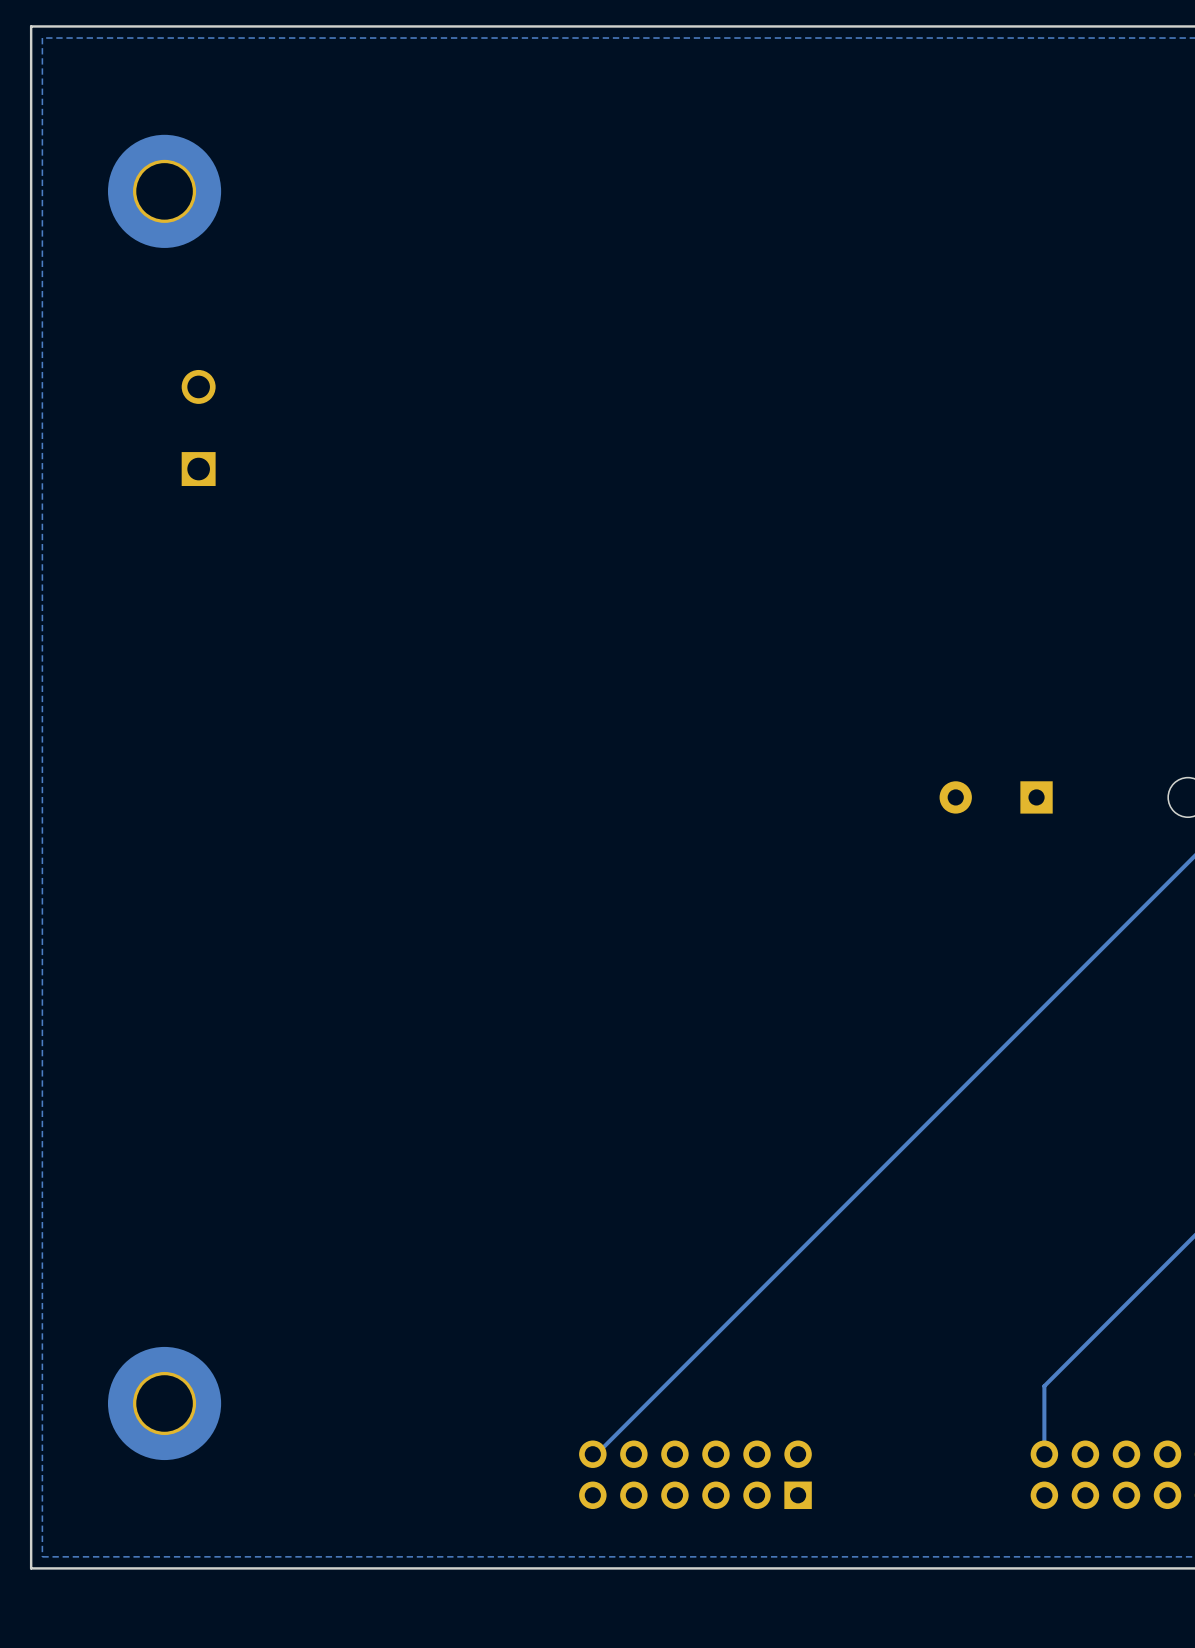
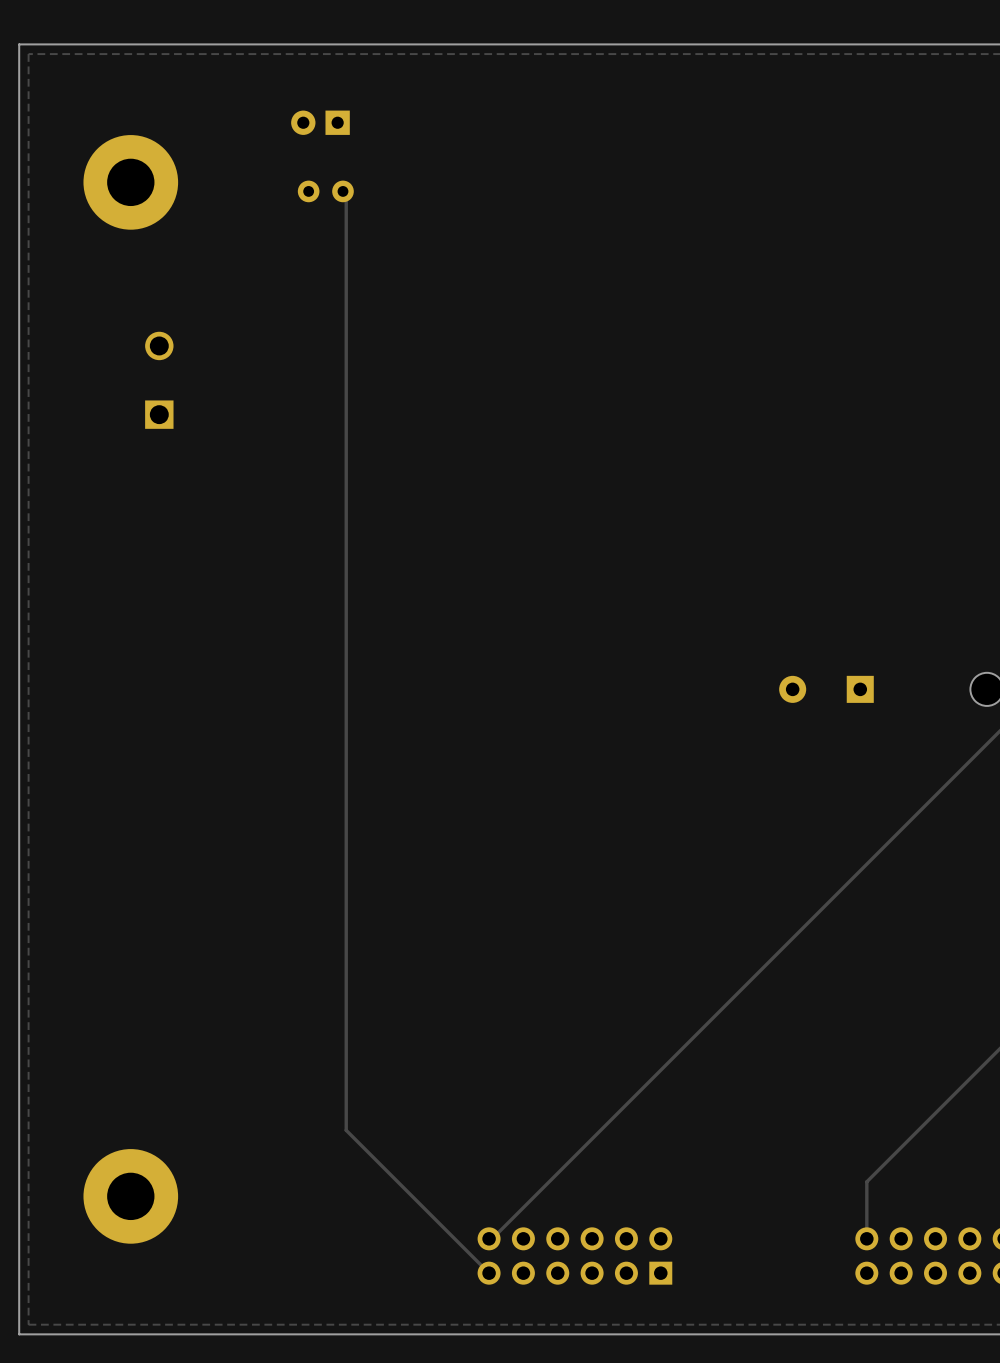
part: none -> (320, 122)
part: none -> (325, 191)
track: none -> (346, 194) (346, 1130) (489, 1273)

